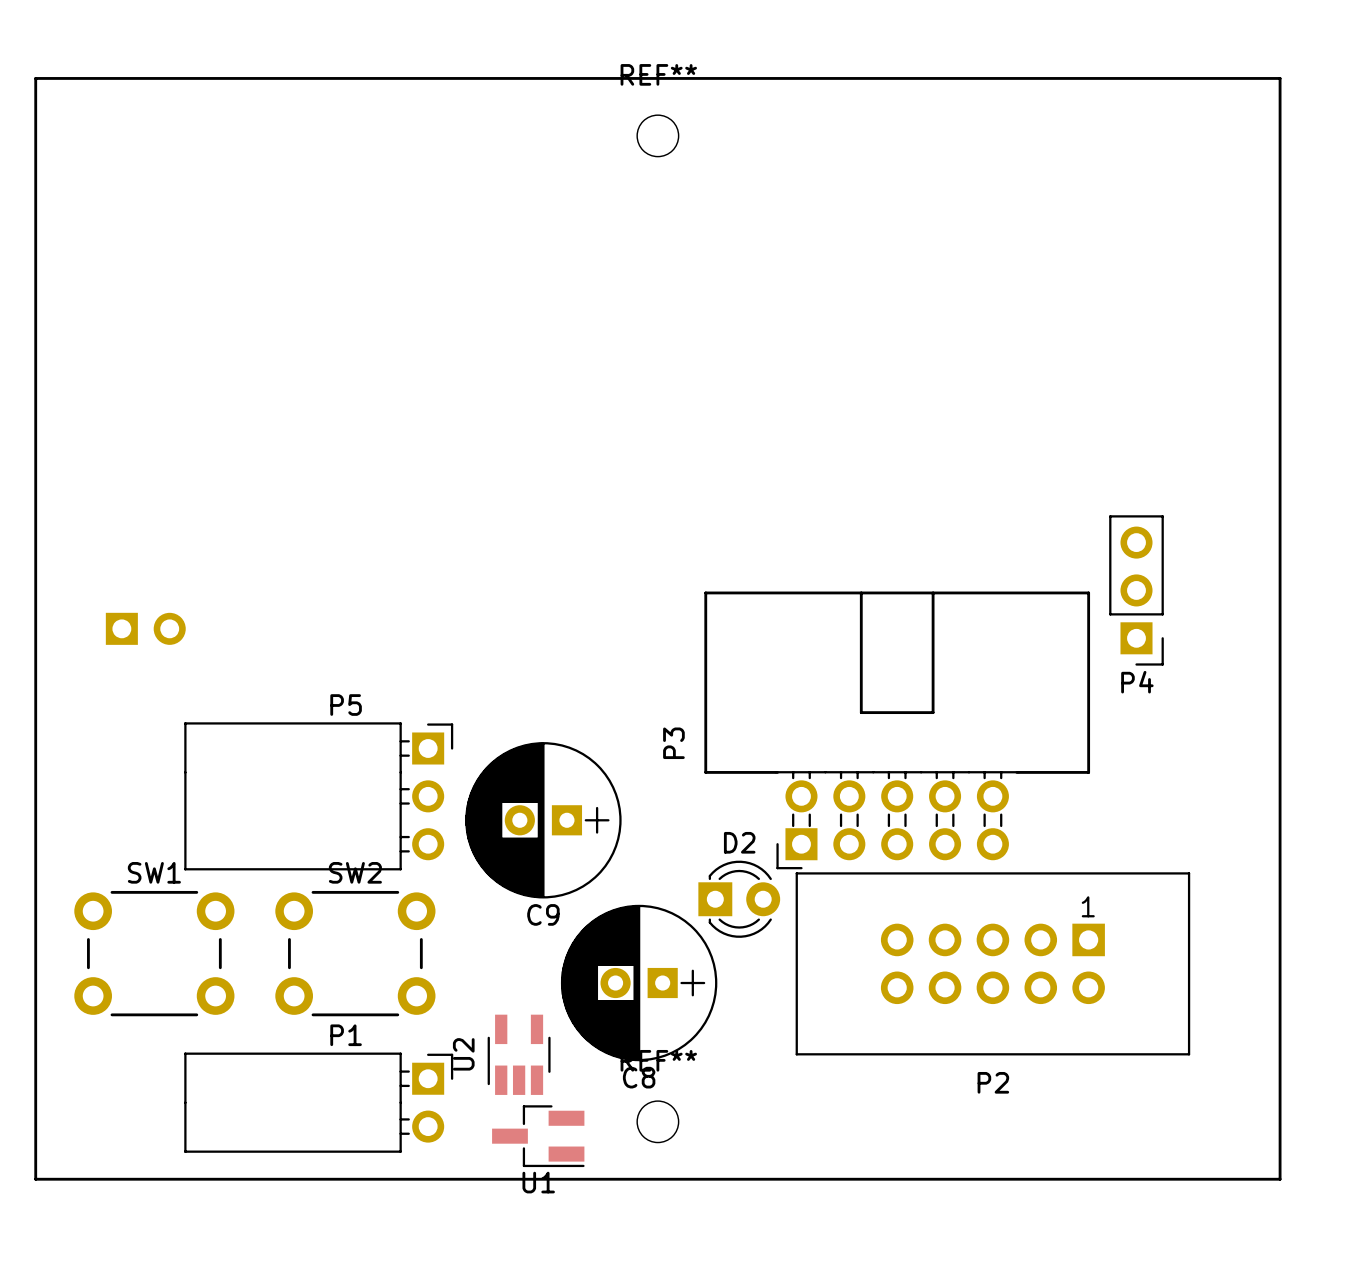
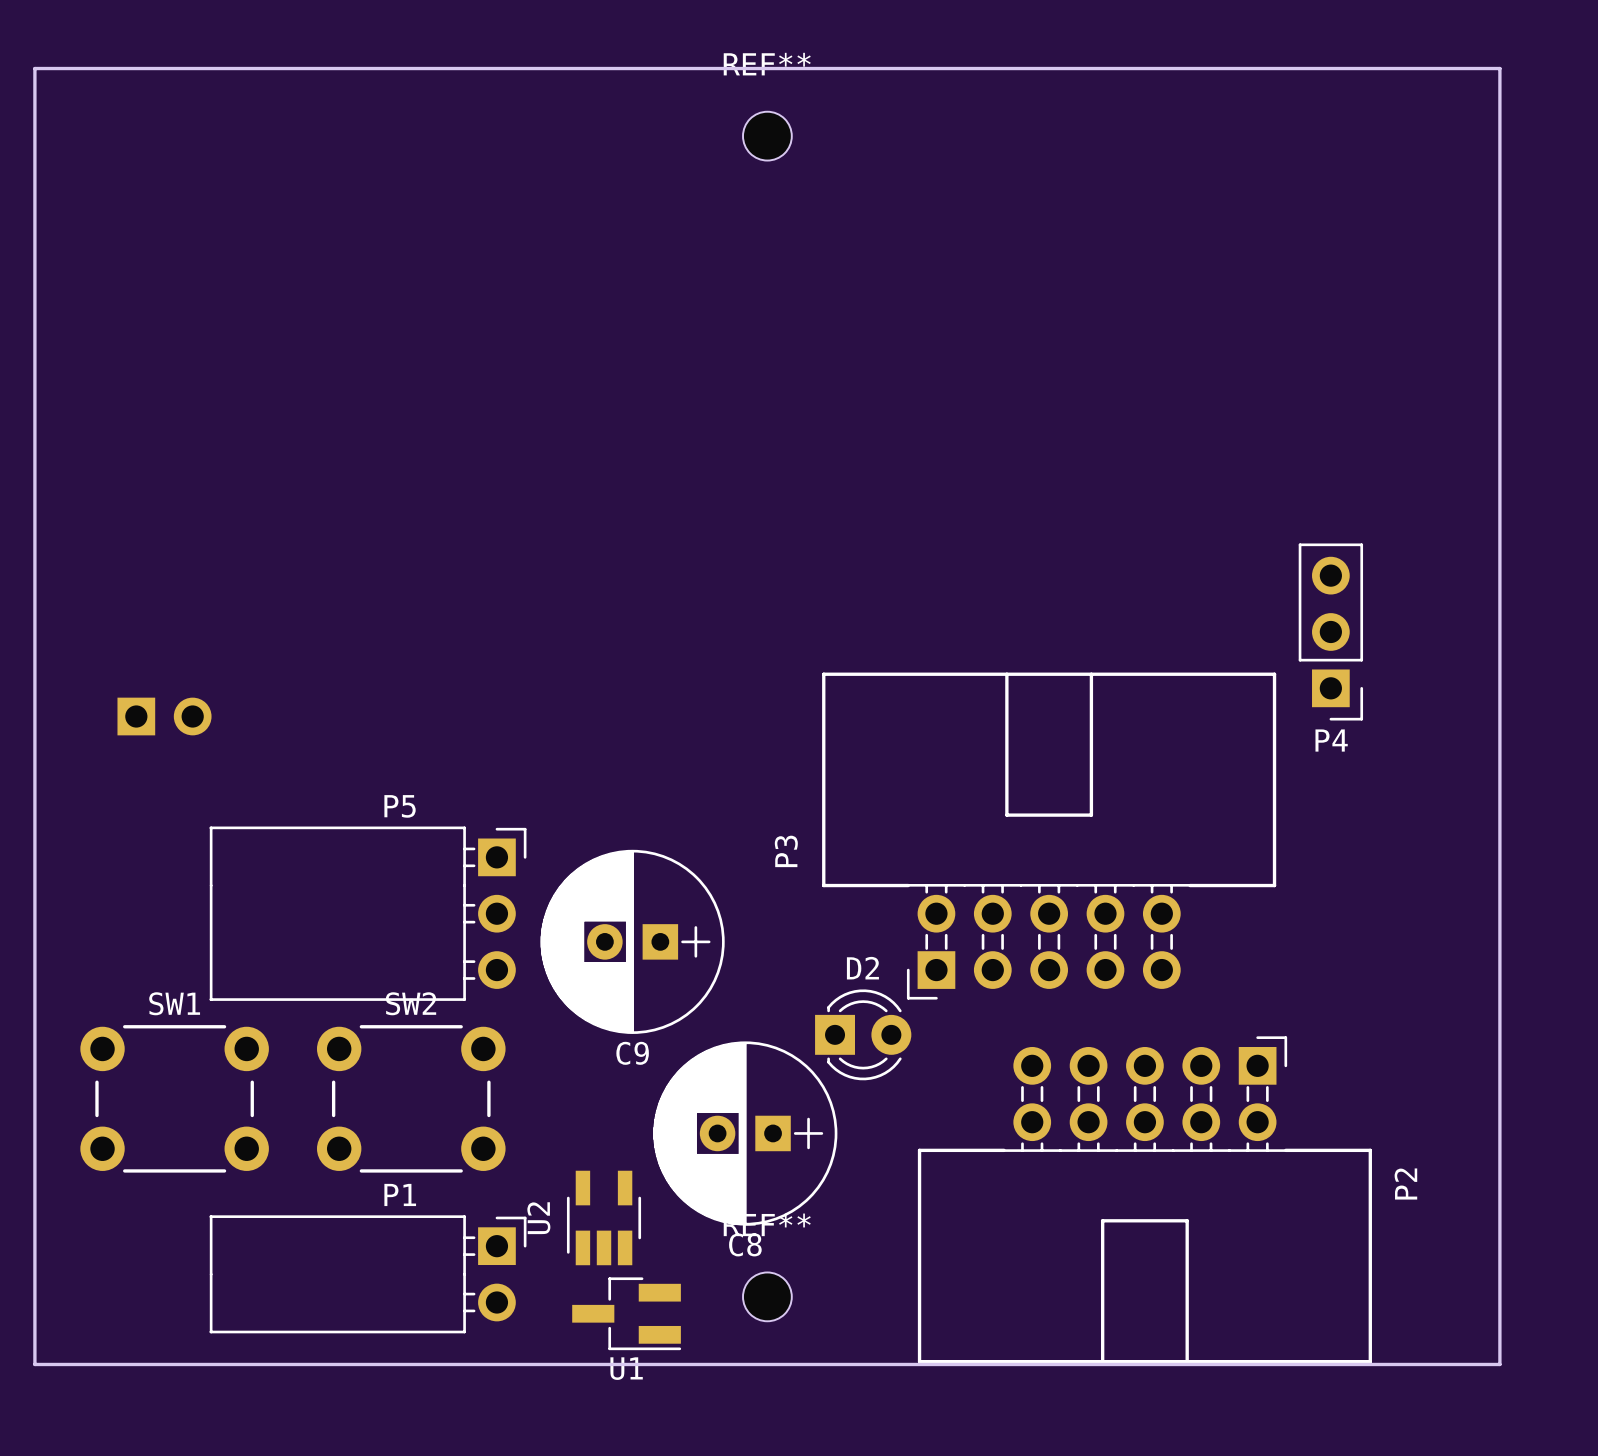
P4 position: (1136, 590) -> (1330, 631)
P2 footprint: [795, 872, 1191, 1056] -> [917, 1036, 1372, 1364]
P2 name position: P2 (993, 1082) -> P2 (1405, 1184)

